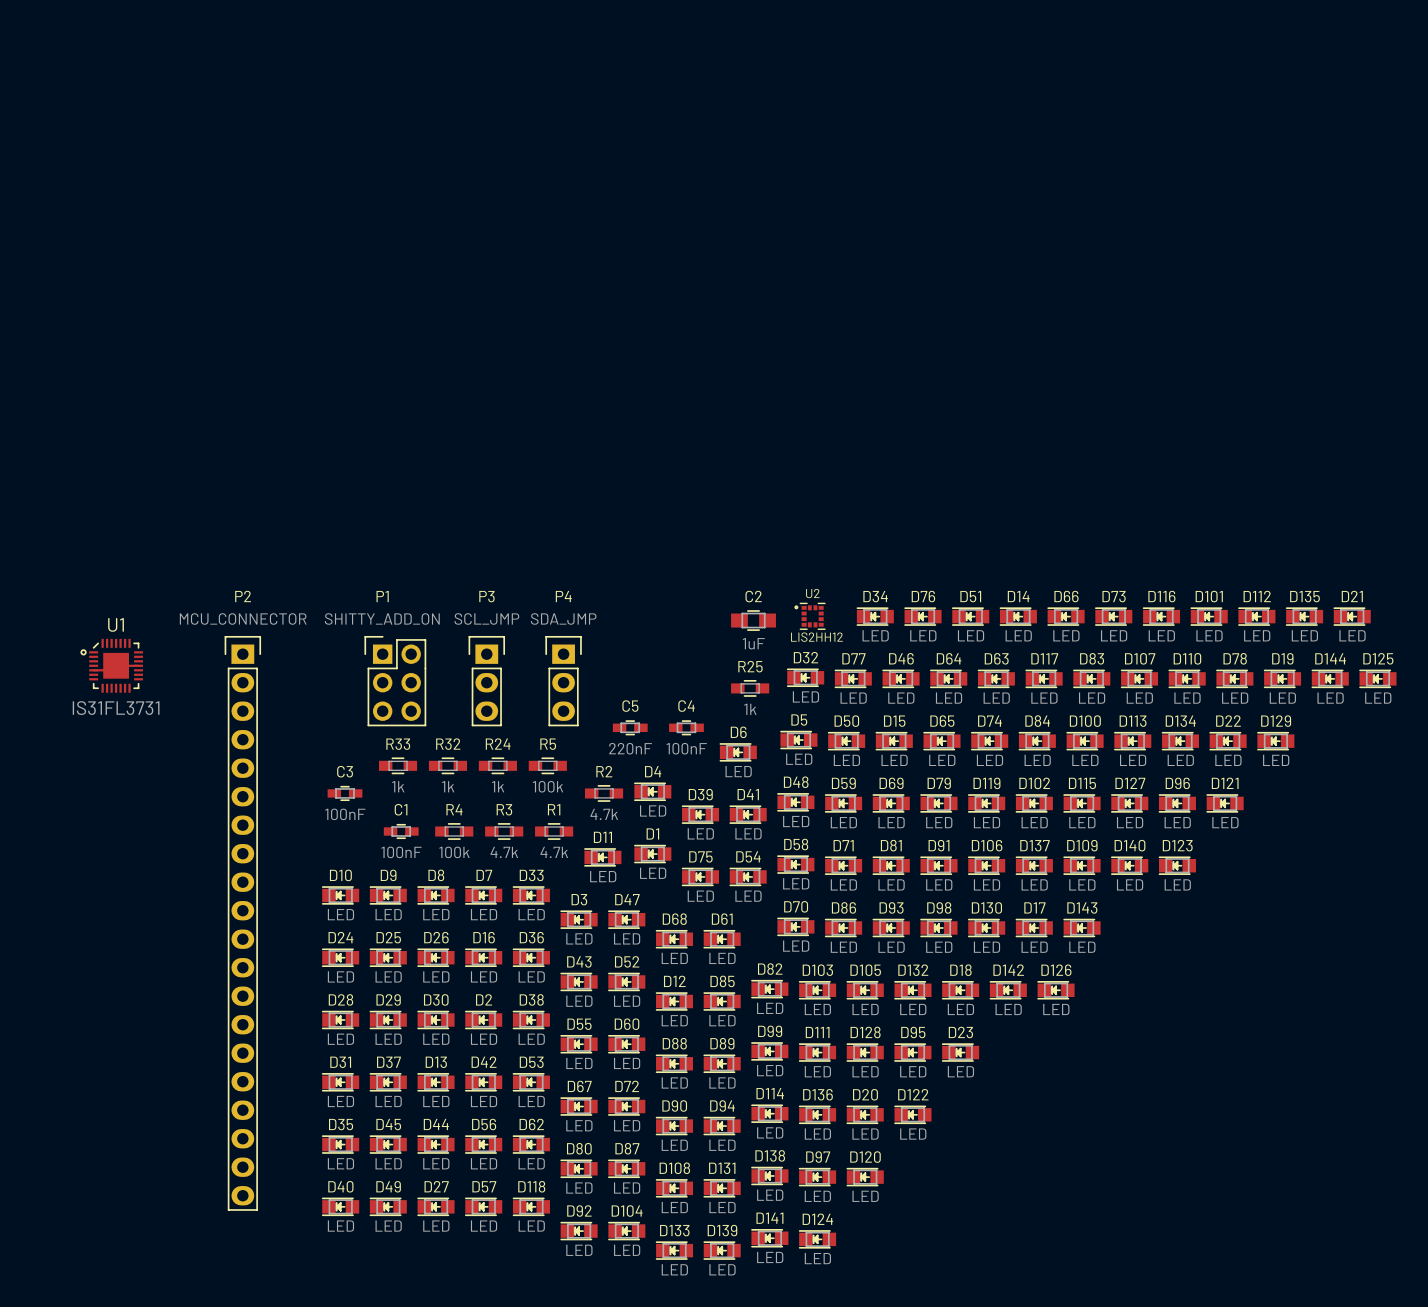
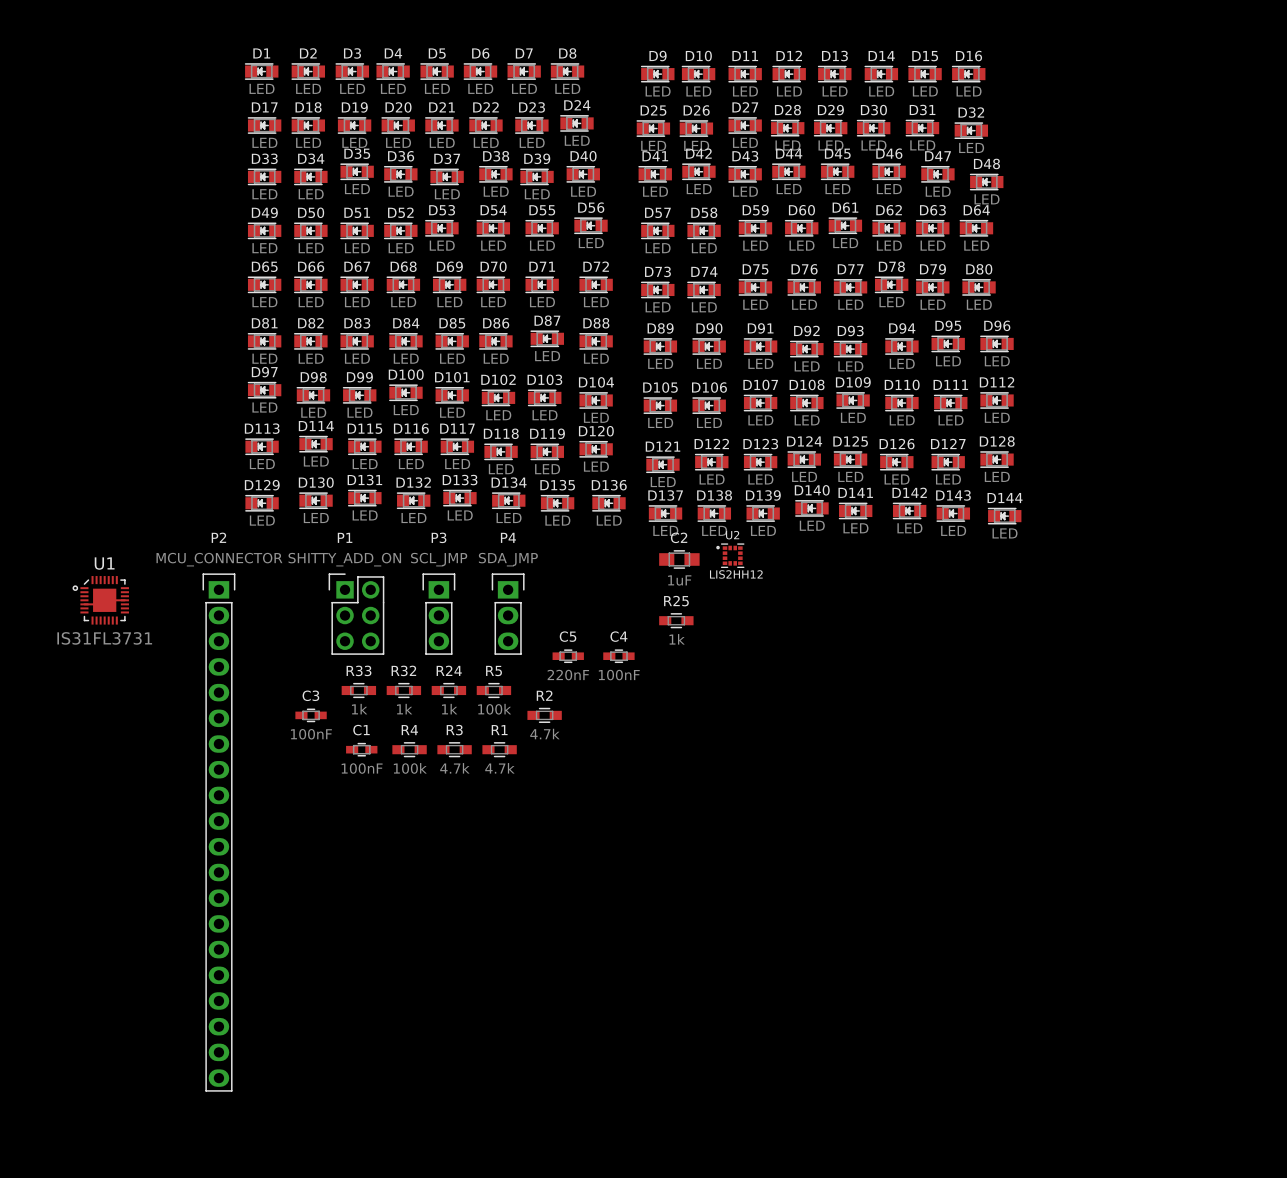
D34 position: (875, 616) -> (310, 176)
D76 position: (922, 616) -> (804, 287)
D51 position: (970, 616) -> (357, 230)
D14 position: (1018, 616) -> (881, 74)
D66 position: (1065, 616) -> (310, 284)
D73 position: (1113, 616) -> (657, 289)
D116 position: (1161, 616) -> (410, 446)
D101 position: (1209, 616) -> (452, 395)
D112 position: (1256, 616) -> (996, 400)
D135 position: (1304, 616) -> (557, 503)
D21 position: (1352, 616) -> (441, 125)
D32 position: (805, 677) -> (971, 130)
D77 position: (853, 678) -> (850, 287)
D46 position: (900, 678) -> (888, 171)
D64 position: (948, 678) -> (976, 228)
D63 position: (996, 678) -> (932, 228)
D117 position: (1044, 678) -> (457, 446)
D83 position: (1091, 678) -> (357, 341)
D107 position: (1139, 678) -> (760, 403)
D110 position: (1187, 678) -> (901, 403)
D78 position: (1234, 678) -> (891, 284)
D19 position: (1282, 678) -> (354, 125)
D144 position: (1330, 678) -> (1004, 516)
D125 position: (1377, 678) -> (850, 459)
D5 position: (798, 740) -> (437, 71)
D50 position: (846, 741) -> (310, 230)
D15 position: (894, 741) -> (924, 74)
D65 position: (941, 741) -> (264, 284)
D74 position: (989, 741) -> (703, 289)
D84 position: (1037, 741) -> (405, 341)
D100 position: (1084, 741) -> (405, 392)
D113 position: (1132, 741) -> (261, 446)
D134 position: (1180, 741) -> (508, 500)
D22 position: (1228, 741) -> (485, 125)
D129 position: (1275, 741) -> (261, 503)
D6 position: (738, 752) -> (480, 71)
D4 position: (652, 791) -> (393, 71)
D48 position: (795, 802) -> (986, 182)
D59 position: (843, 803) -> (755, 228)
D69 position: (891, 803) -> (449, 284)
D79 position: (938, 803) -> (932, 287)
D119 position: (986, 803) -> (547, 451)
D102 position: (1034, 803) -> (498, 397)
D115 position: (1081, 803) -> (364, 446)
D127 position: (1129, 803) -> (948, 462)
D96 position: (1177, 803) -> (996, 343)
D121 position: (1225, 803) -> (662, 464)
D39 position: (700, 814) -> (536, 176)
D41 position: (748, 814) -> (655, 174)
D1 position: (652, 854) -> (261, 71)
D11 position: (602, 857) -> (745, 74)
D58 position: (795, 864) -> (703, 230)
D71 position: (843, 865) -> (542, 284)
D81 position: (891, 865) -> (264, 341)
D91 position: (938, 865) -> (760, 346)
D106 position: (986, 865) -> (709, 405)
D137 position: (1034, 865) -> (665, 513)
D109 position: (1081, 865) -> (852, 400)
D140 position: (1129, 865) -> (811, 508)
D123 position: (1177, 865) -> (760, 462)
D75 position: (700, 876) -> (755, 287)
D54 position: (748, 876) -> (493, 228)
D10 position: (340, 895) -> (698, 74)
D9 position: (388, 895) -> (657, 74)
D8 position: (435, 895) -> (567, 71)
D7 position: (483, 895) -> (524, 71)
D33 position: (531, 895) -> (264, 176)
D3 position: (578, 919) -> (352, 71)
D47 position: (626, 919) -> (937, 174)
D70 position: (795, 926) -> (493, 284)
D86 position: (843, 927) -> (495, 341)
D93 position: (891, 927) -> (850, 349)
D98 position: (938, 927) -> (313, 395)
D130 position: (986, 927) -> (315, 500)
D17 position: (1034, 927) -> (264, 125)
D143 position: (1081, 927) -> (953, 513)
D68 position: (674, 939) -> (403, 284)
D61 position: (722, 939) -> (845, 225)
D24 position: (340, 957) -> (576, 123)
D25 position: (388, 957) -> (653, 128)
D26 position: (435, 957) -> (696, 128)
D16 position: (483, 957) -> (968, 74)
D36 position: (531, 957) -> (400, 174)
D43 position: (578, 981) -> (745, 174)
D52 position: (626, 981) -> (400, 230)
D82 position: (769, 989) -> (310, 341)
D103 position: (817, 990) -> (544, 397)
D105 position: (865, 990) -> (660, 405)
D132 position: (912, 990) -> (413, 500)
D18 position: (960, 990) -> (308, 125)
D142 position: (1008, 990) -> (909, 510)
D126 position: (1055, 990) -> (896, 462)
D12 position: (674, 1001) -> (789, 74)
D85 position: (722, 1001) -> (452, 341)
D28 position: (340, 1020) -> (787, 128)
D29 position: (388, 1020) -> (830, 128)
D30 position: (435, 1020) -> (873, 128)
D2 position: (483, 1020) -> (308, 71)
D38 position: (531, 1020) -> (495, 174)
D55 position: (578, 1044) -> (542, 228)
D60 position: (626, 1044) -> (801, 228)
D99 position: (769, 1051) -> (359, 395)
D111 position: (817, 1052) -> (950, 403)
D128 position: (865, 1052) -> (996, 459)
D95 position: (912, 1052) -> (948, 343)
D23 position: (960, 1052) -> (531, 125)
D88 position: (674, 1063) -> (596, 341)
D89 position: (722, 1063) -> (660, 346)
D31 position: (340, 1082) -> (922, 128)
D37 position: (388, 1082) -> (446, 176)
D13 position: (435, 1082) -> (834, 74)
D42 position: (483, 1082) -> (698, 171)
D53 position: (531, 1082) -> (441, 228)
D67 position: (578, 1106) -> (357, 284)
D72 position: (626, 1106) -> (596, 284)
D114 position: (769, 1113) -> (315, 444)
D136 position: (817, 1114) -> (608, 503)
D20 position: (865, 1114) -> (398, 125)
D122 position: (912, 1114) -> (711, 462)
D90 position: (674, 1126) -> (709, 346)
D94 position: (722, 1126) -> (901, 346)
D35 position: (340, 1144) -> (357, 171)
D45 position: (388, 1144) -> (837, 171)
D44 position: (435, 1144) -> (788, 171)
D56 position: (483, 1144) -> (590, 225)
D62 position: (531, 1144) -> (888, 228)
D80 position: (578, 1168) -> (978, 287)
D87 position: (626, 1168) -> (547, 338)
D138 position: (769, 1175) -> (714, 513)
D97 position: (817, 1177) -> (264, 390)
D120 position: (865, 1177) -> (596, 449)
D108 position: (674, 1188) -> (806, 403)
D131 position: (722, 1188) -> (364, 498)
D40 position: (340, 1206) -> (583, 174)
D49 position: (388, 1206) -> (264, 230)
D27 position: (435, 1206) -> (745, 125)
D57 position: (483, 1206) -> (657, 230)
D118 position: (531, 1206) -> (500, 451)
D92 position: (578, 1231) -> (806, 349)
D104 position: (626, 1231) -> (596, 400)
D141 position: (769, 1238) -> (855, 510)
D124 position: (817, 1239) -> (804, 459)
D133 position: (674, 1250) -> (459, 498)
D139 position: (722, 1250) -> (763, 513)

